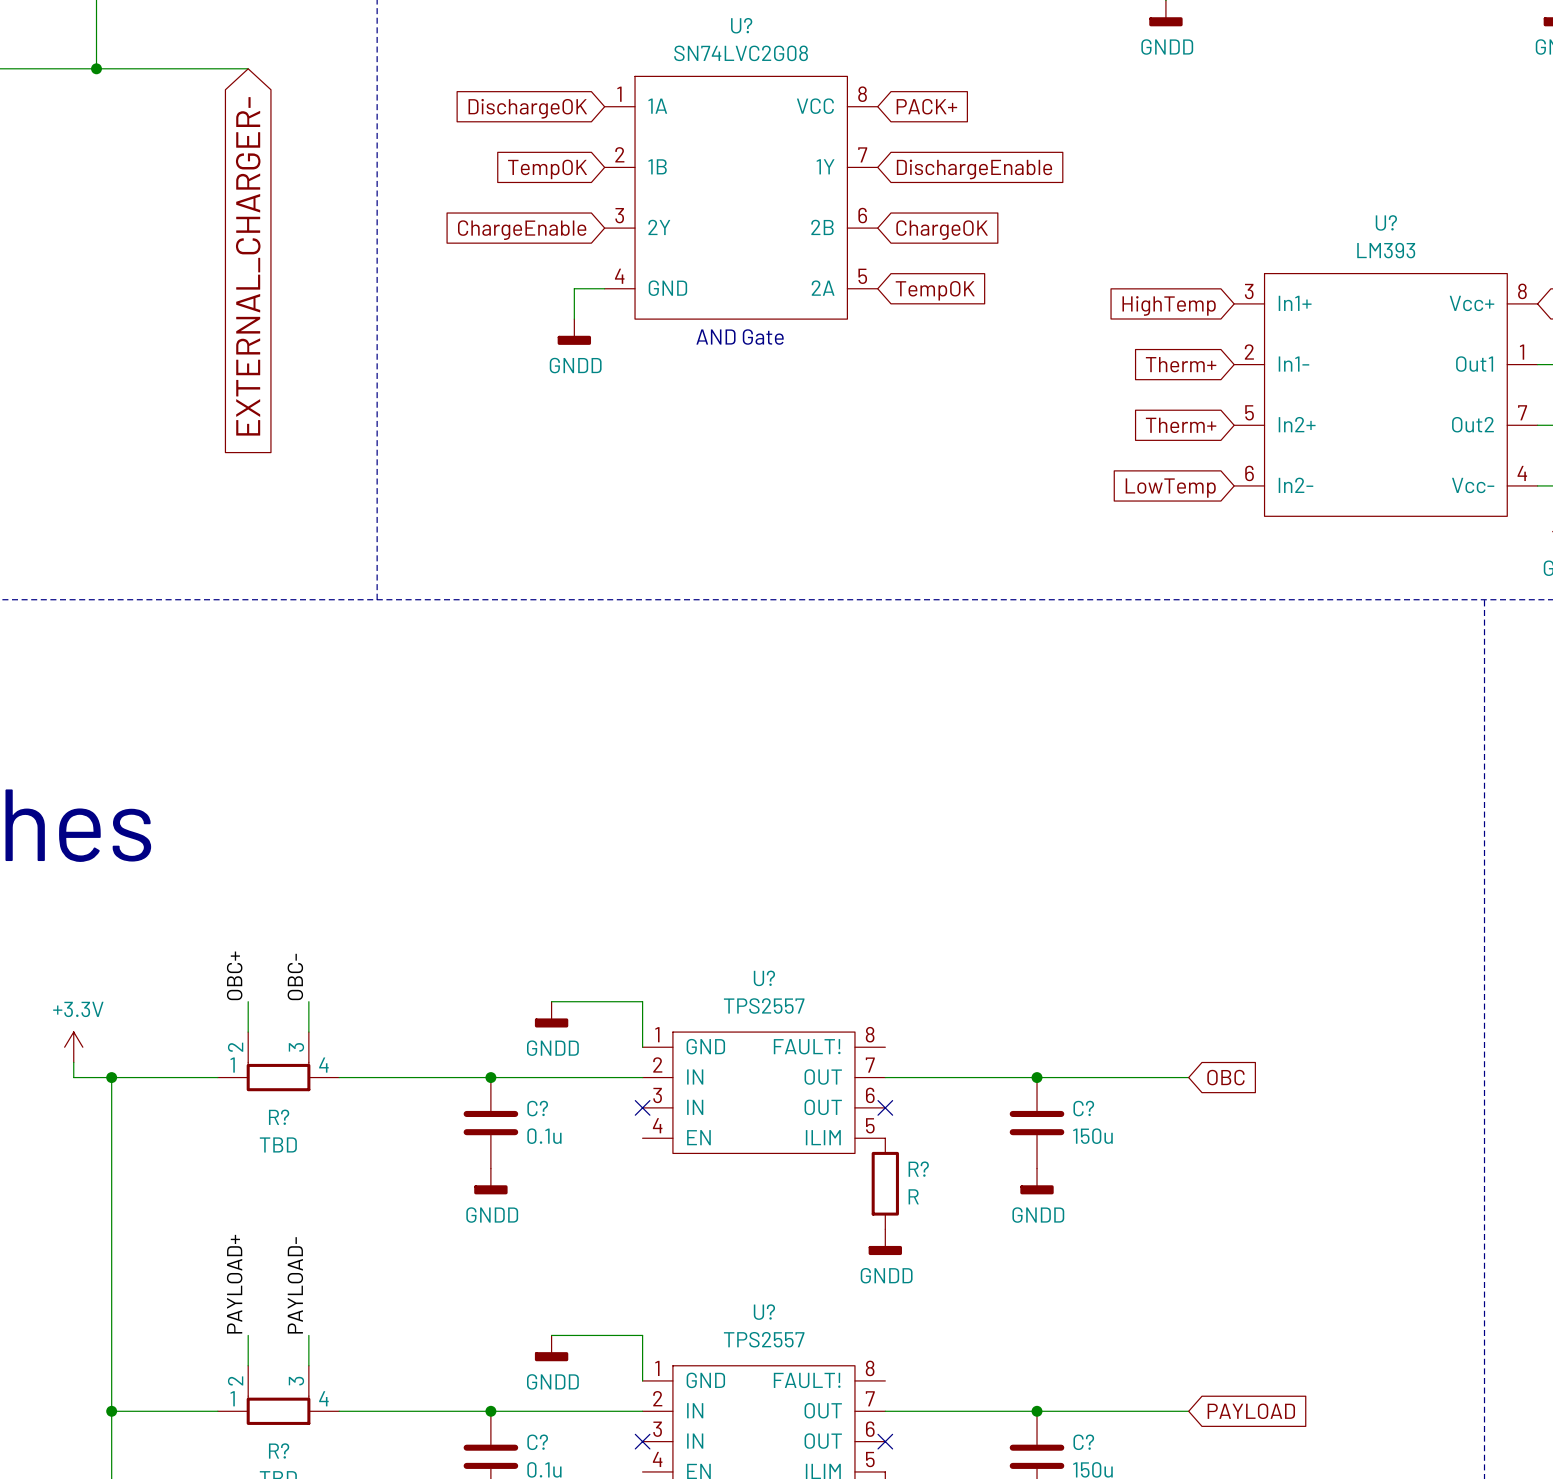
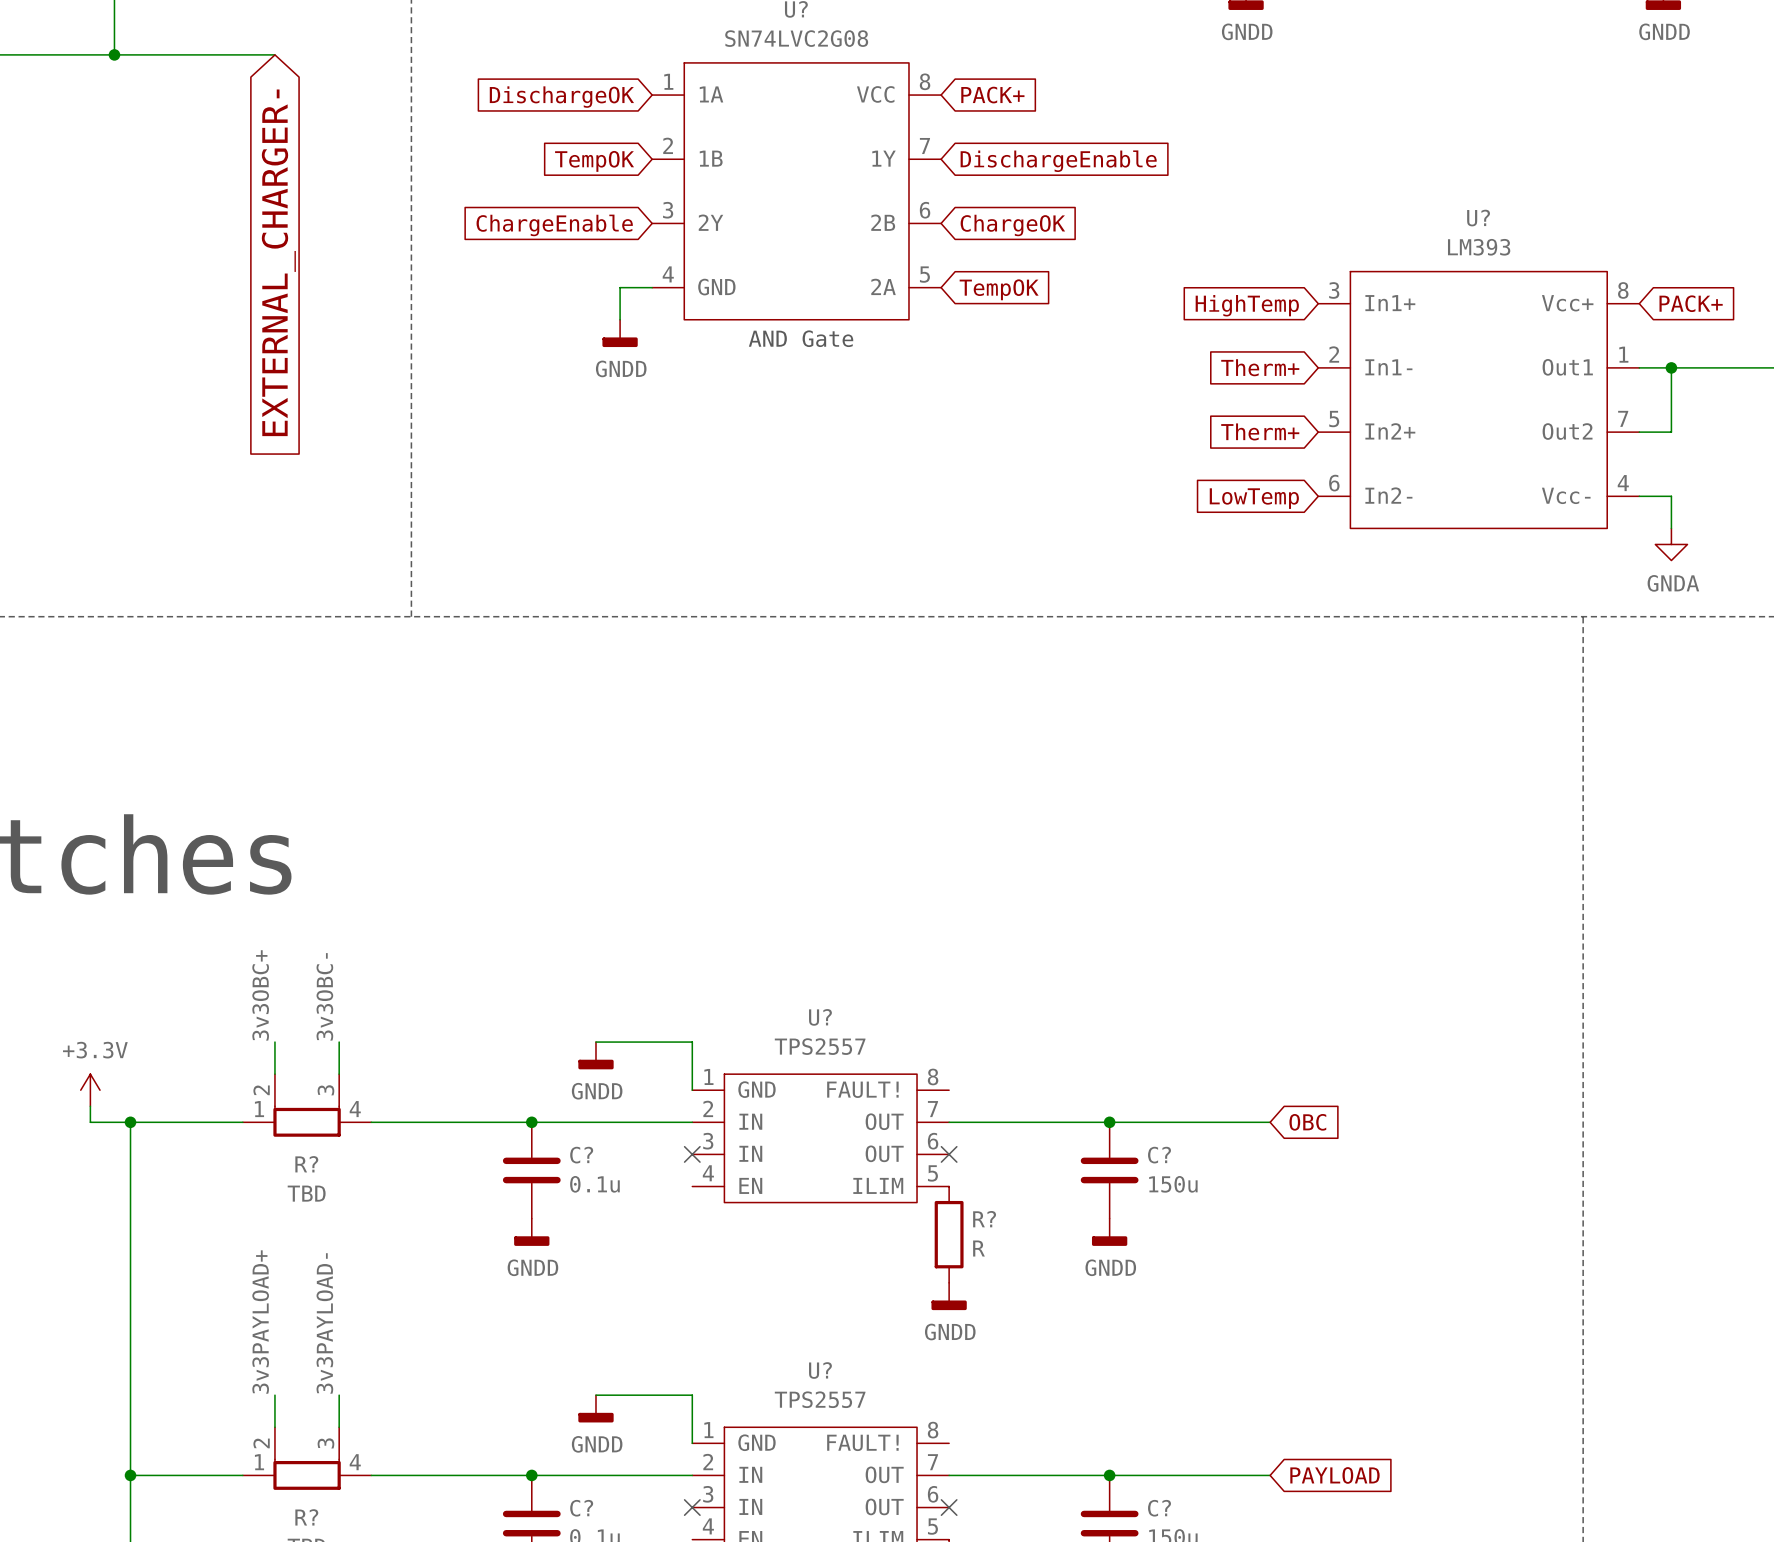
label: OBC+ (234, 975) -> 3v3OBC+ (260, 995)
label: OBC- (295, 976) -> 3v3OBC- (324, 996)
label: PAYLOAD+ (234, 1284) -> 3v3PAYLOAD+ (260, 1322)
label: PAYLOAD- (295, 1285) -> 3v3PAYLOAD- (324, 1323)

